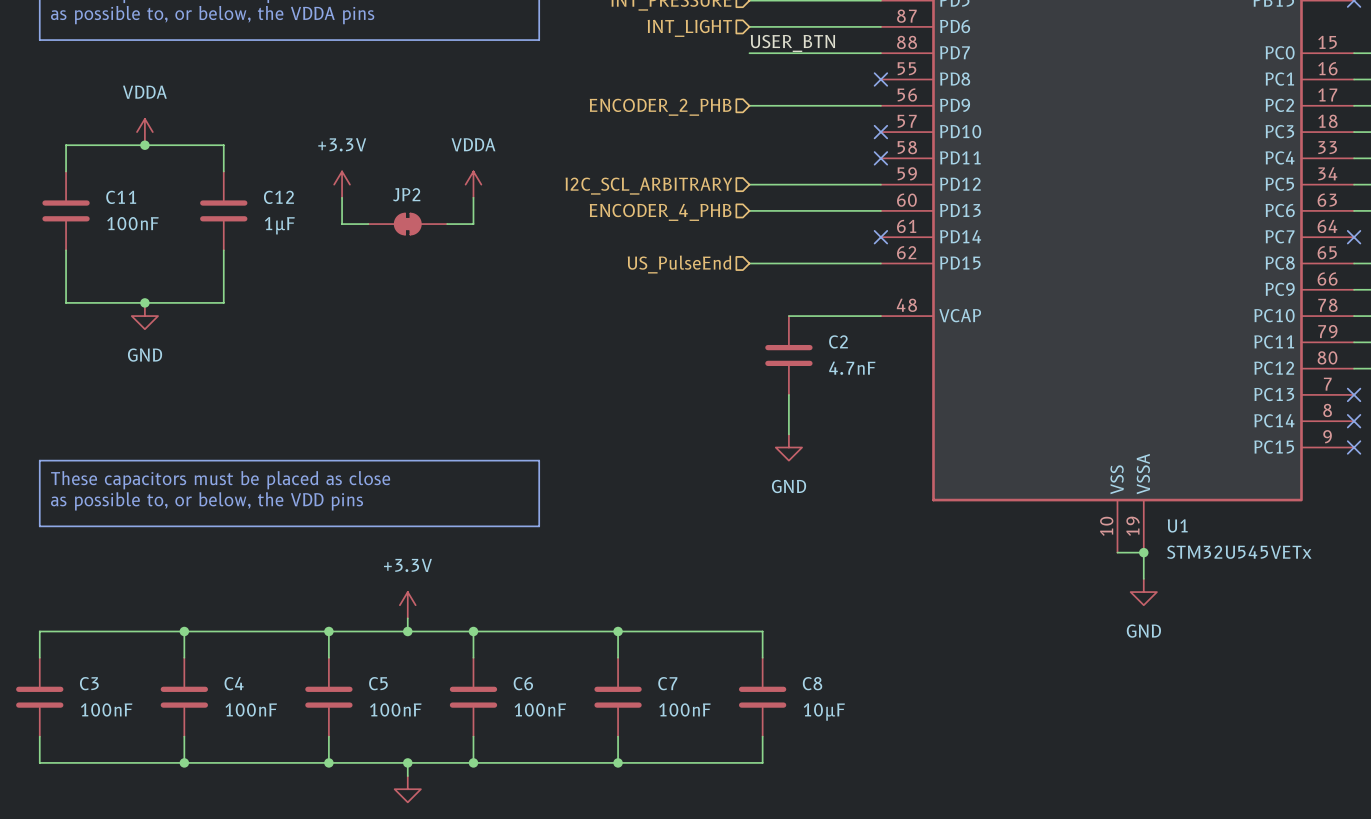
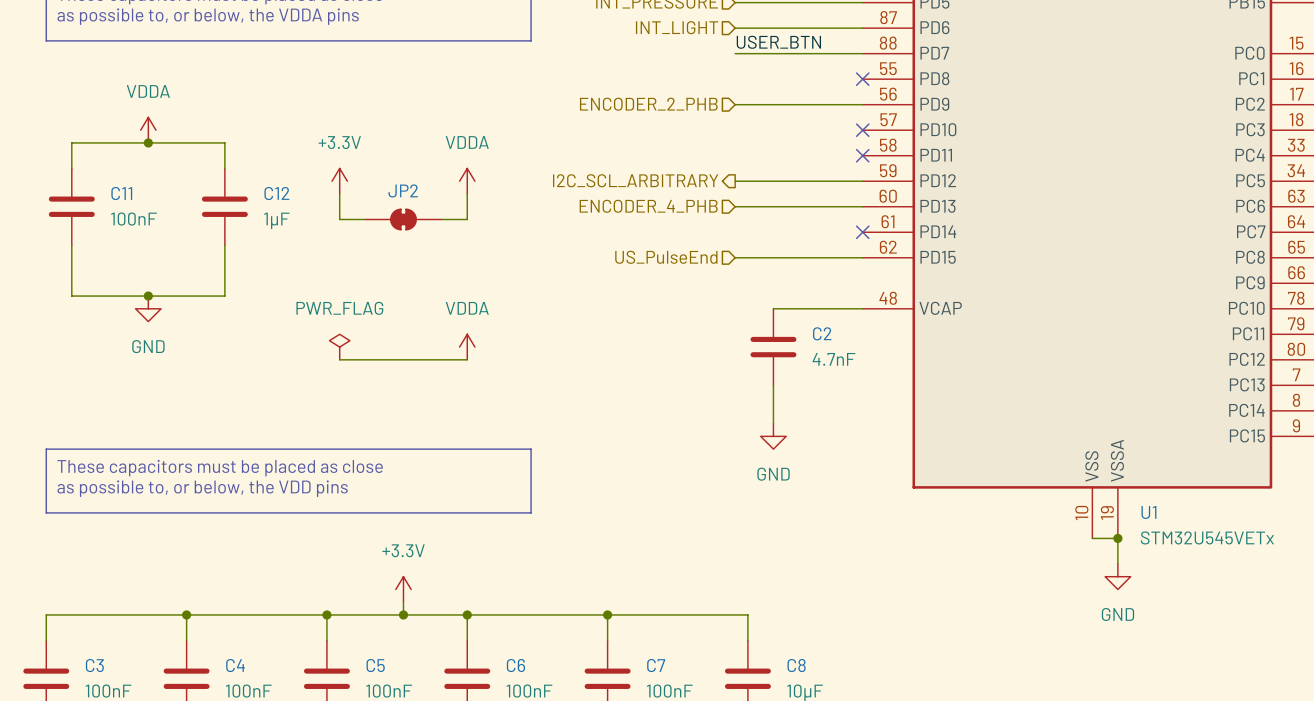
hierarchical label shape: input (648, 186) -> output (635, 180)
power symbol: none -> PWR_FLAG (339, 347)
power symbol: none -> VDDA (467, 347)
wire: none -> (339, 359) (467, 359)

